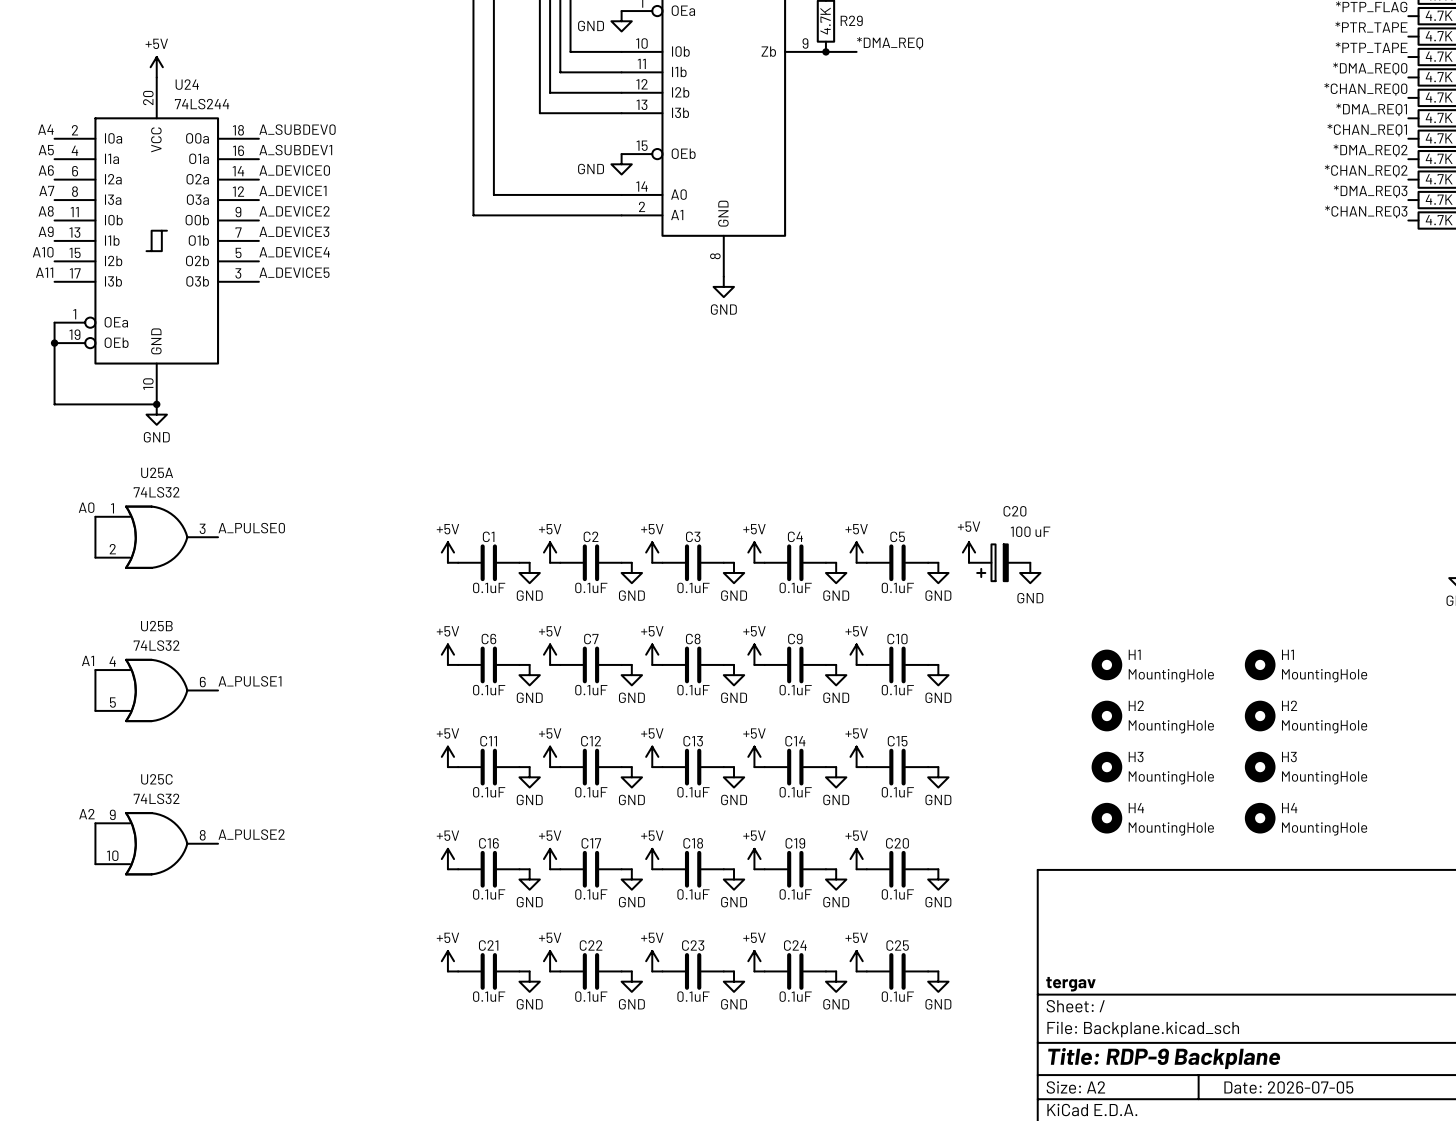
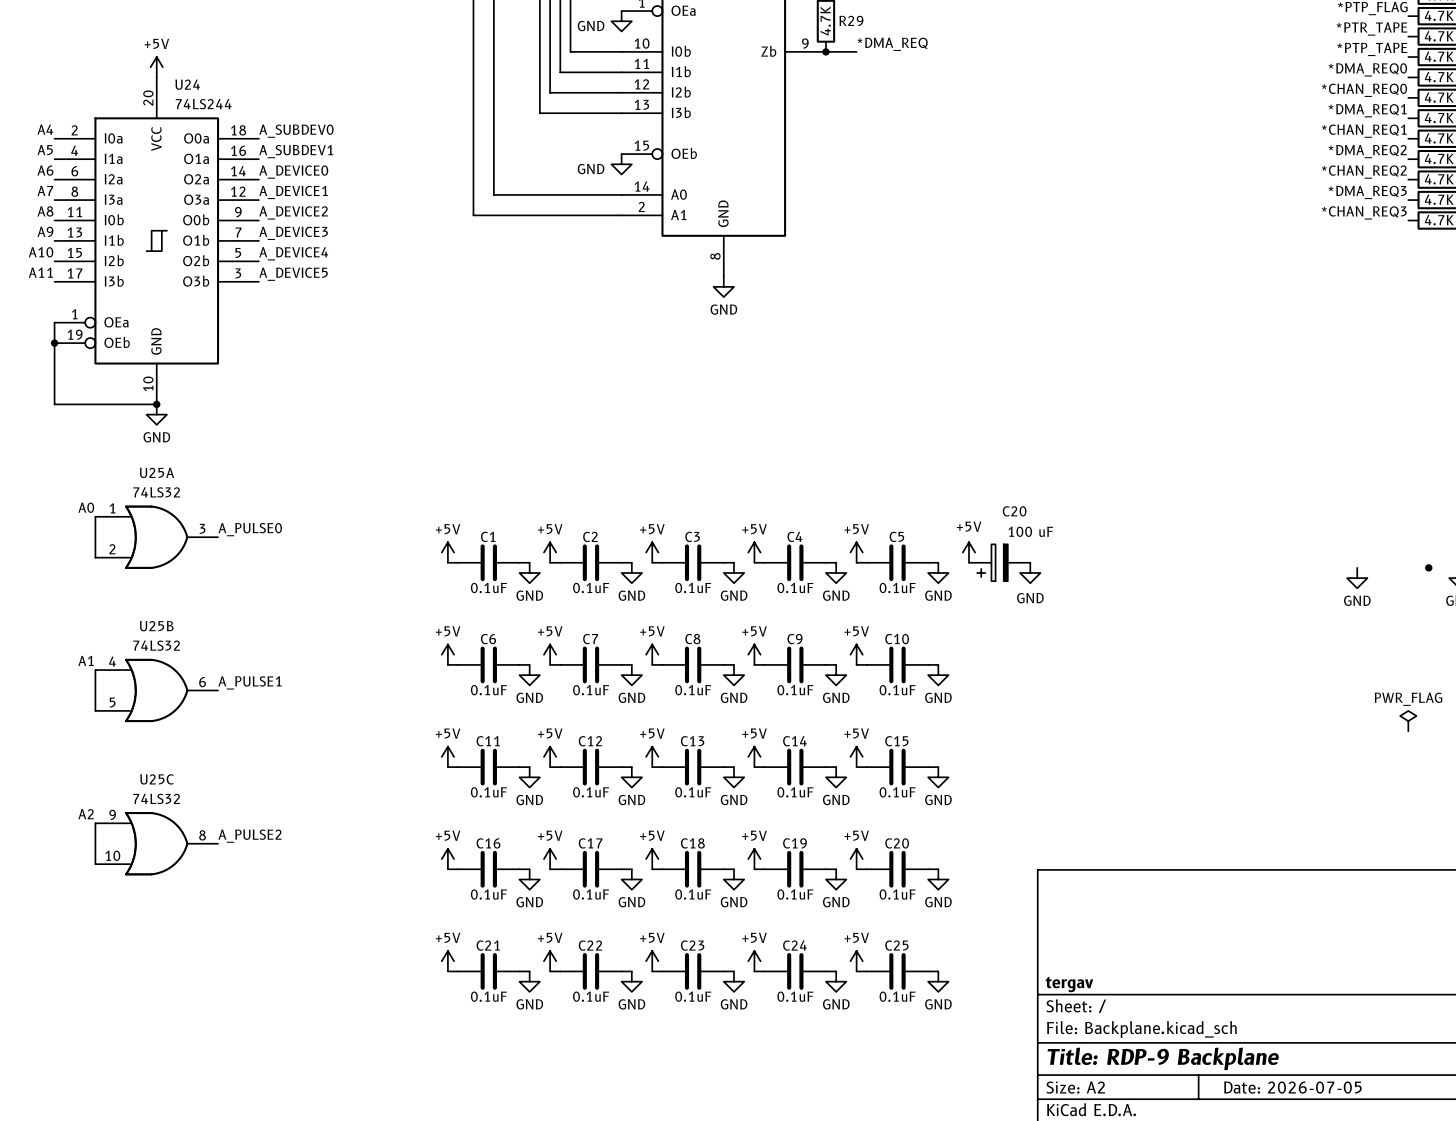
junction: none -> (1428, 567)
power symbol: none -> GND (1357, 578)
H1: MountingHole (1106, 664) -> none
H1: MountingHole (1260, 664) -> none
H2: MountingHole (1106, 716) -> none
H2: MountingHole (1260, 716) -> none
power symbol: none -> PWR_FLAG (1408, 721)
H3: MountingHole (1106, 767) -> none
H3: MountingHole (1260, 767) -> none
H4: MountingHole (1106, 818) -> none
H4: MountingHole (1260, 818) -> none

